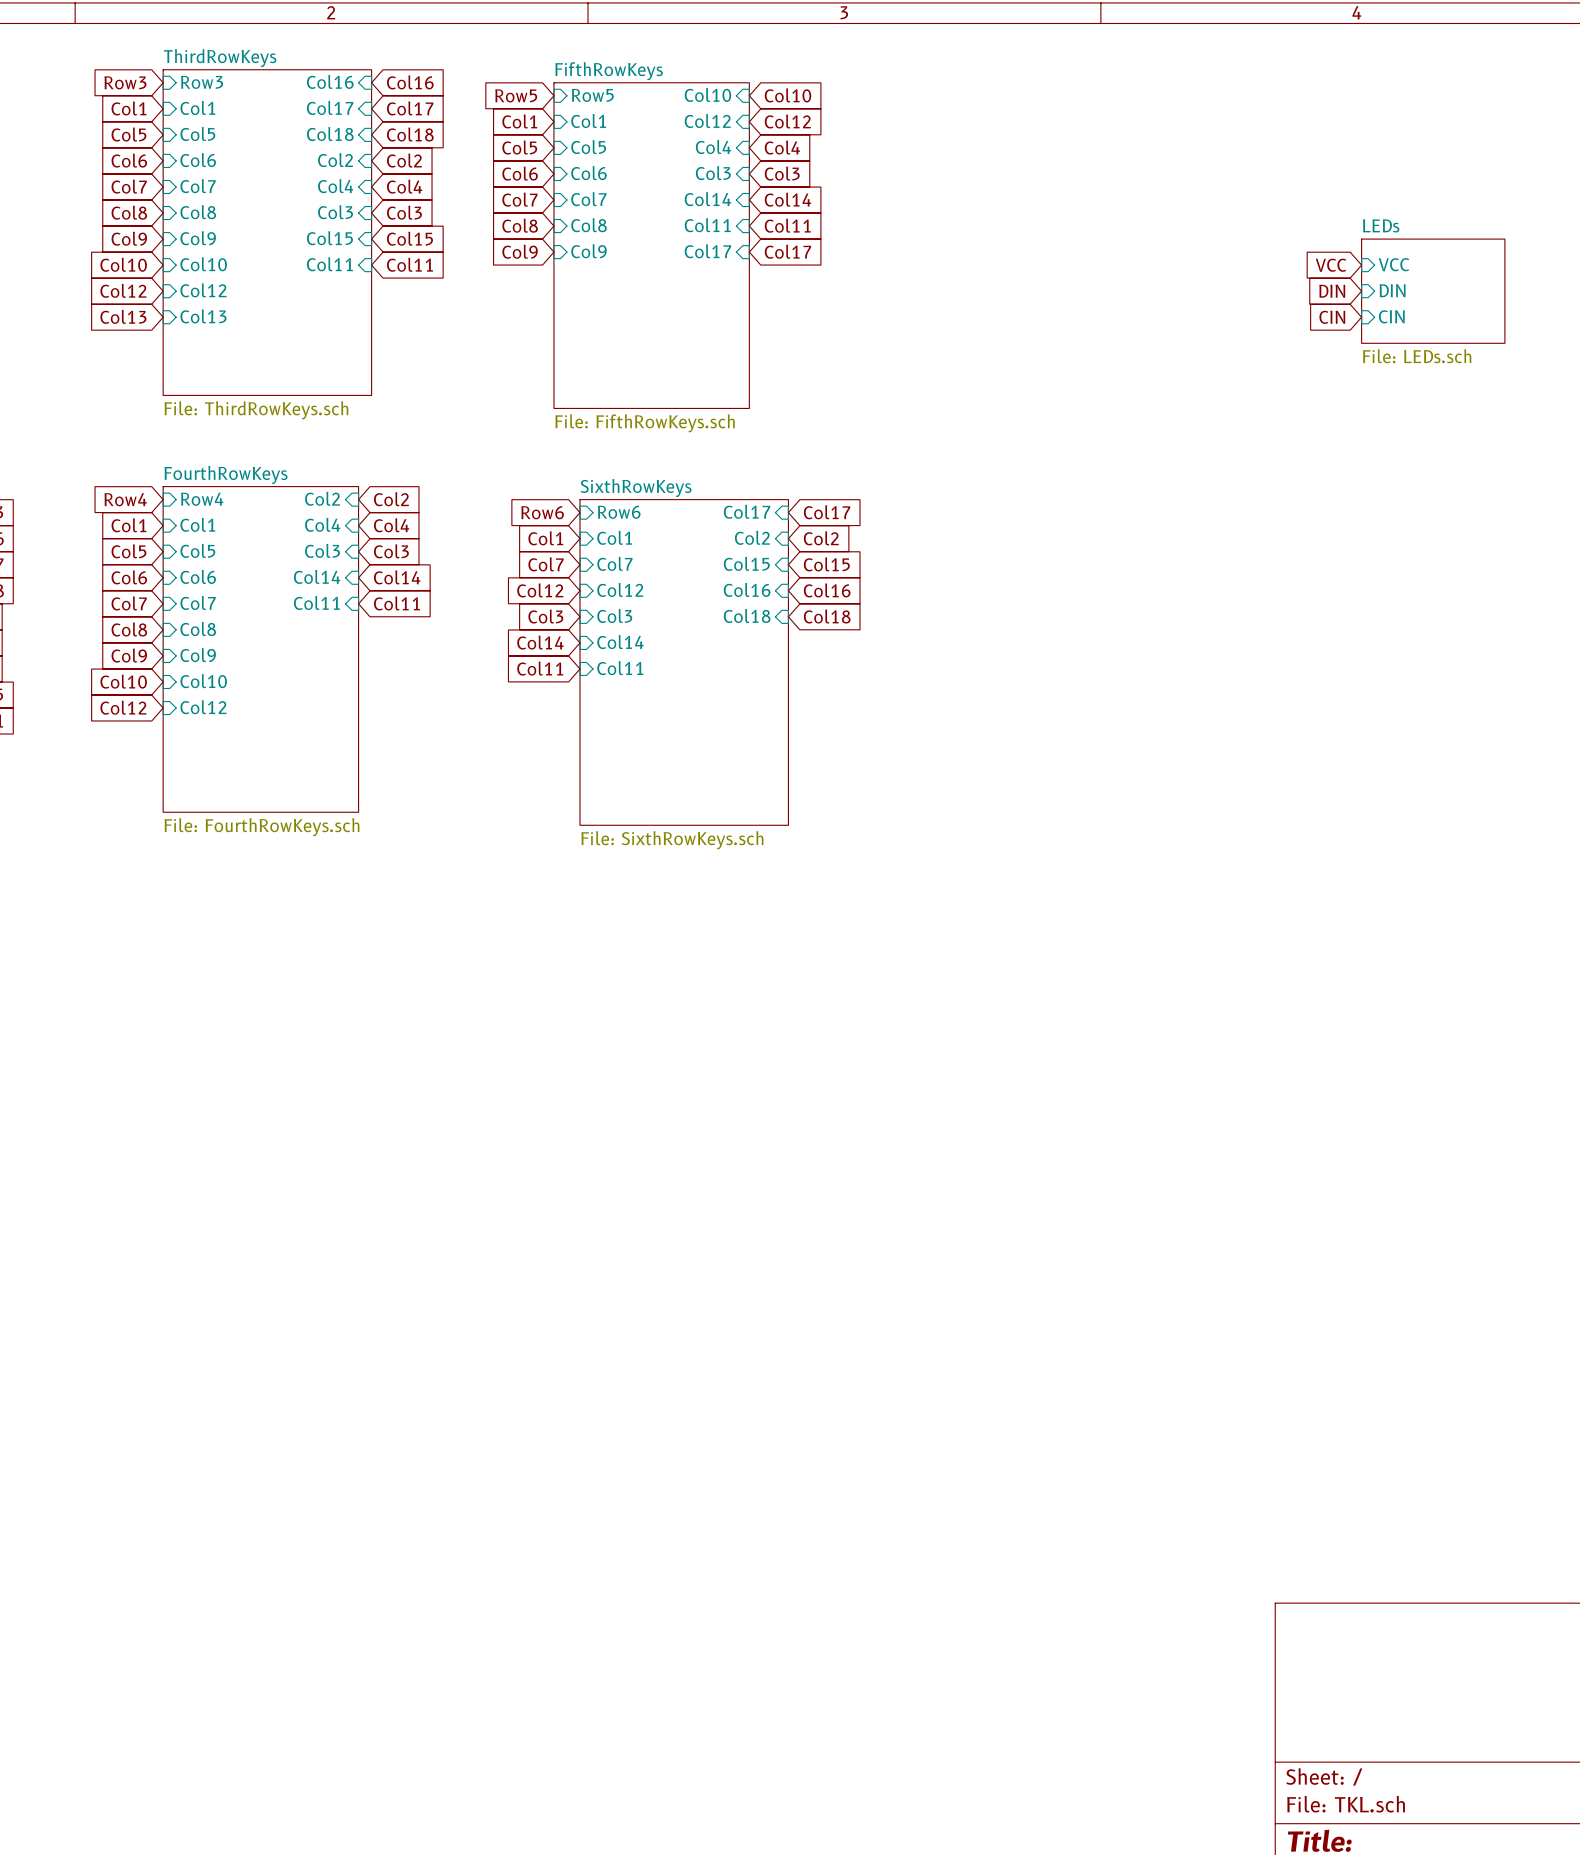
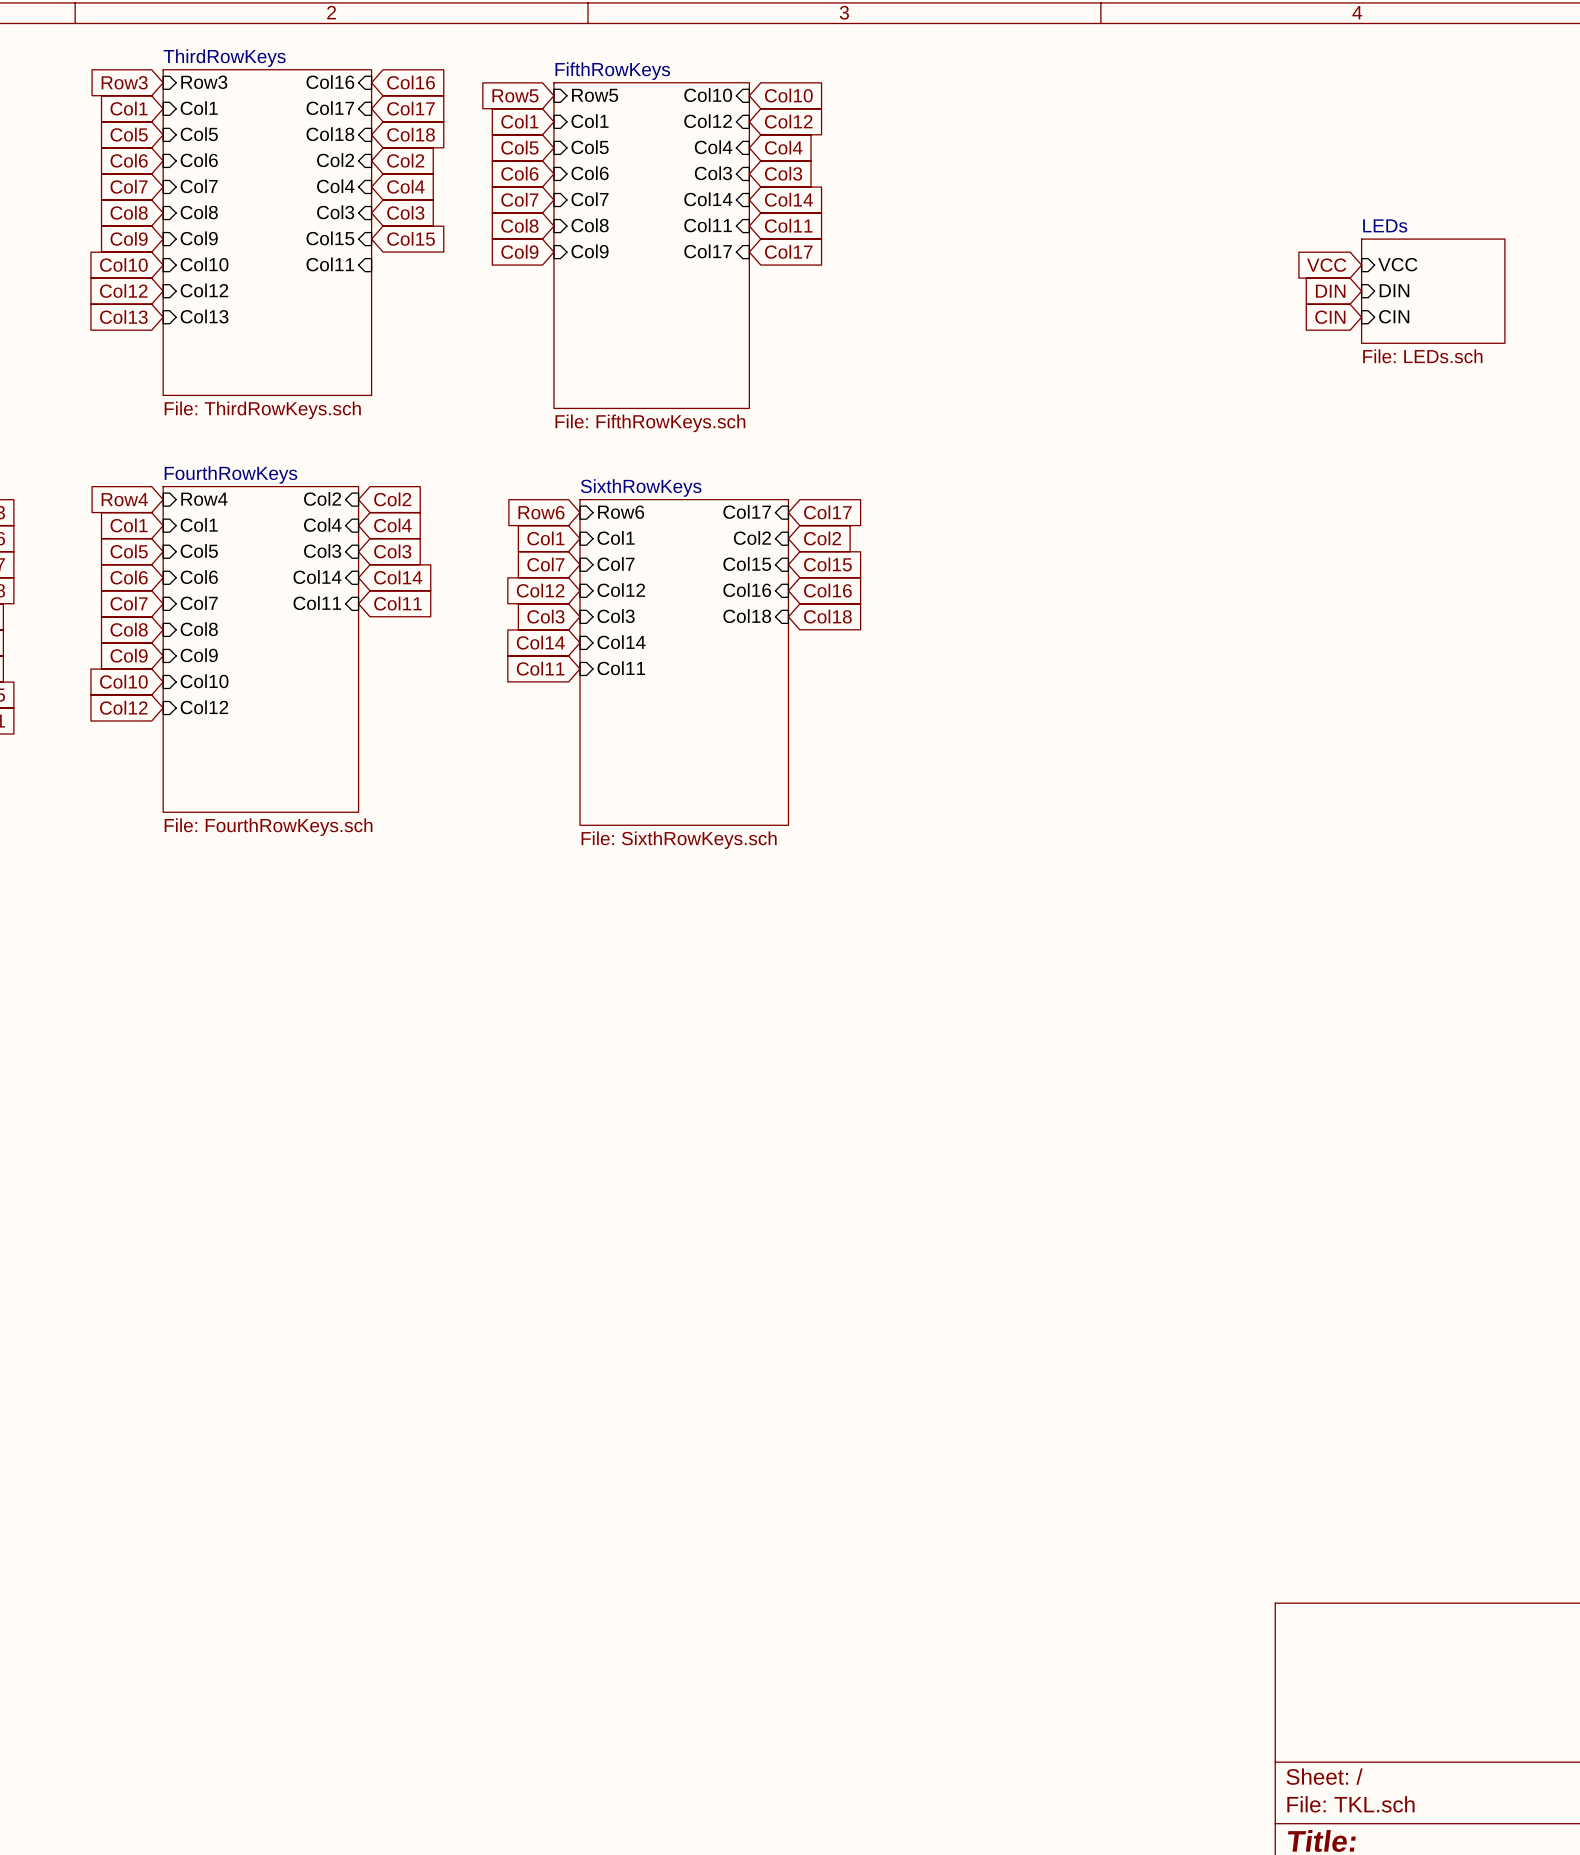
global label: Col11 (409, 264) -> none

